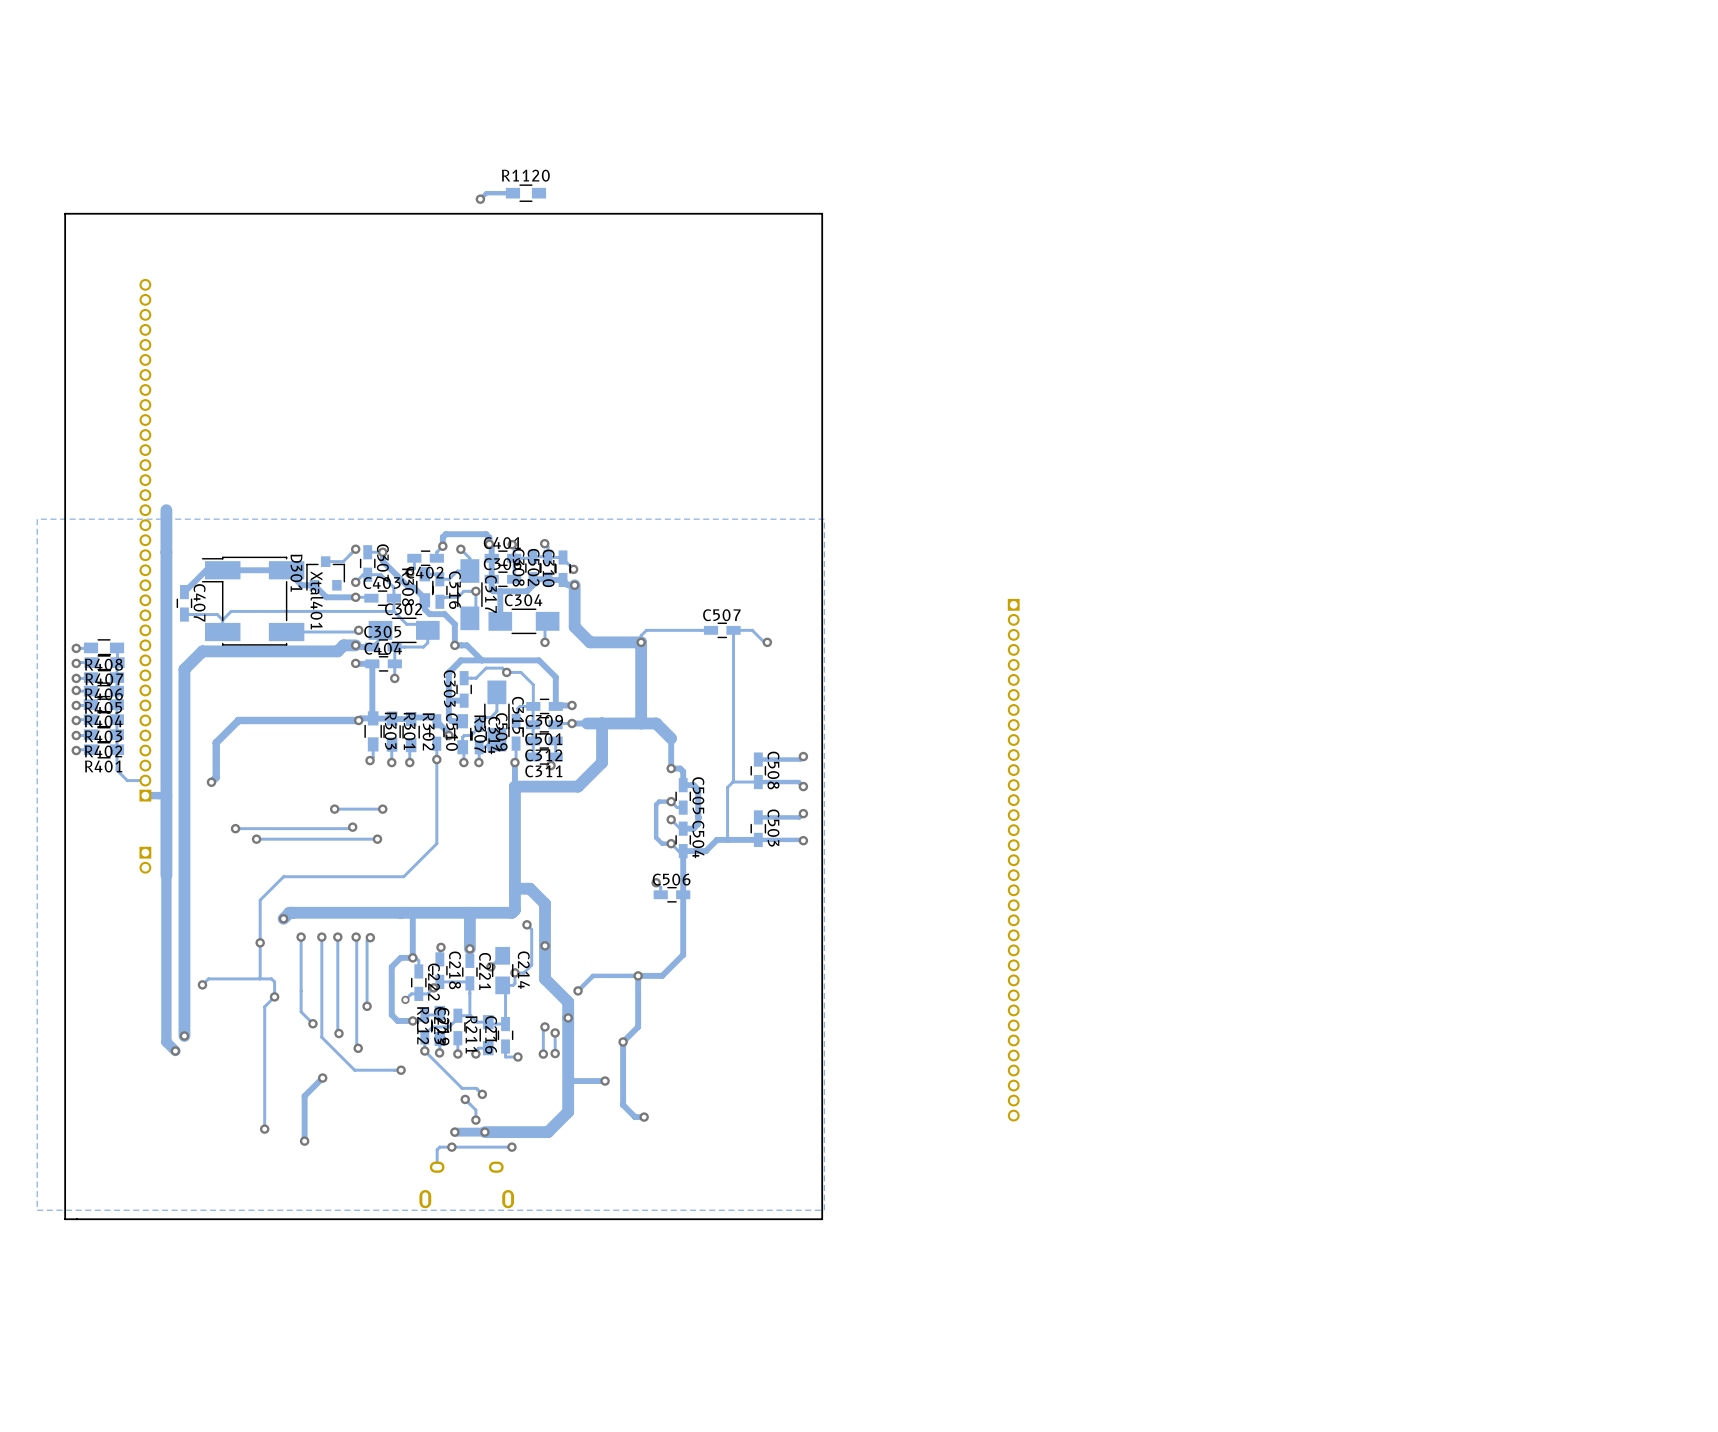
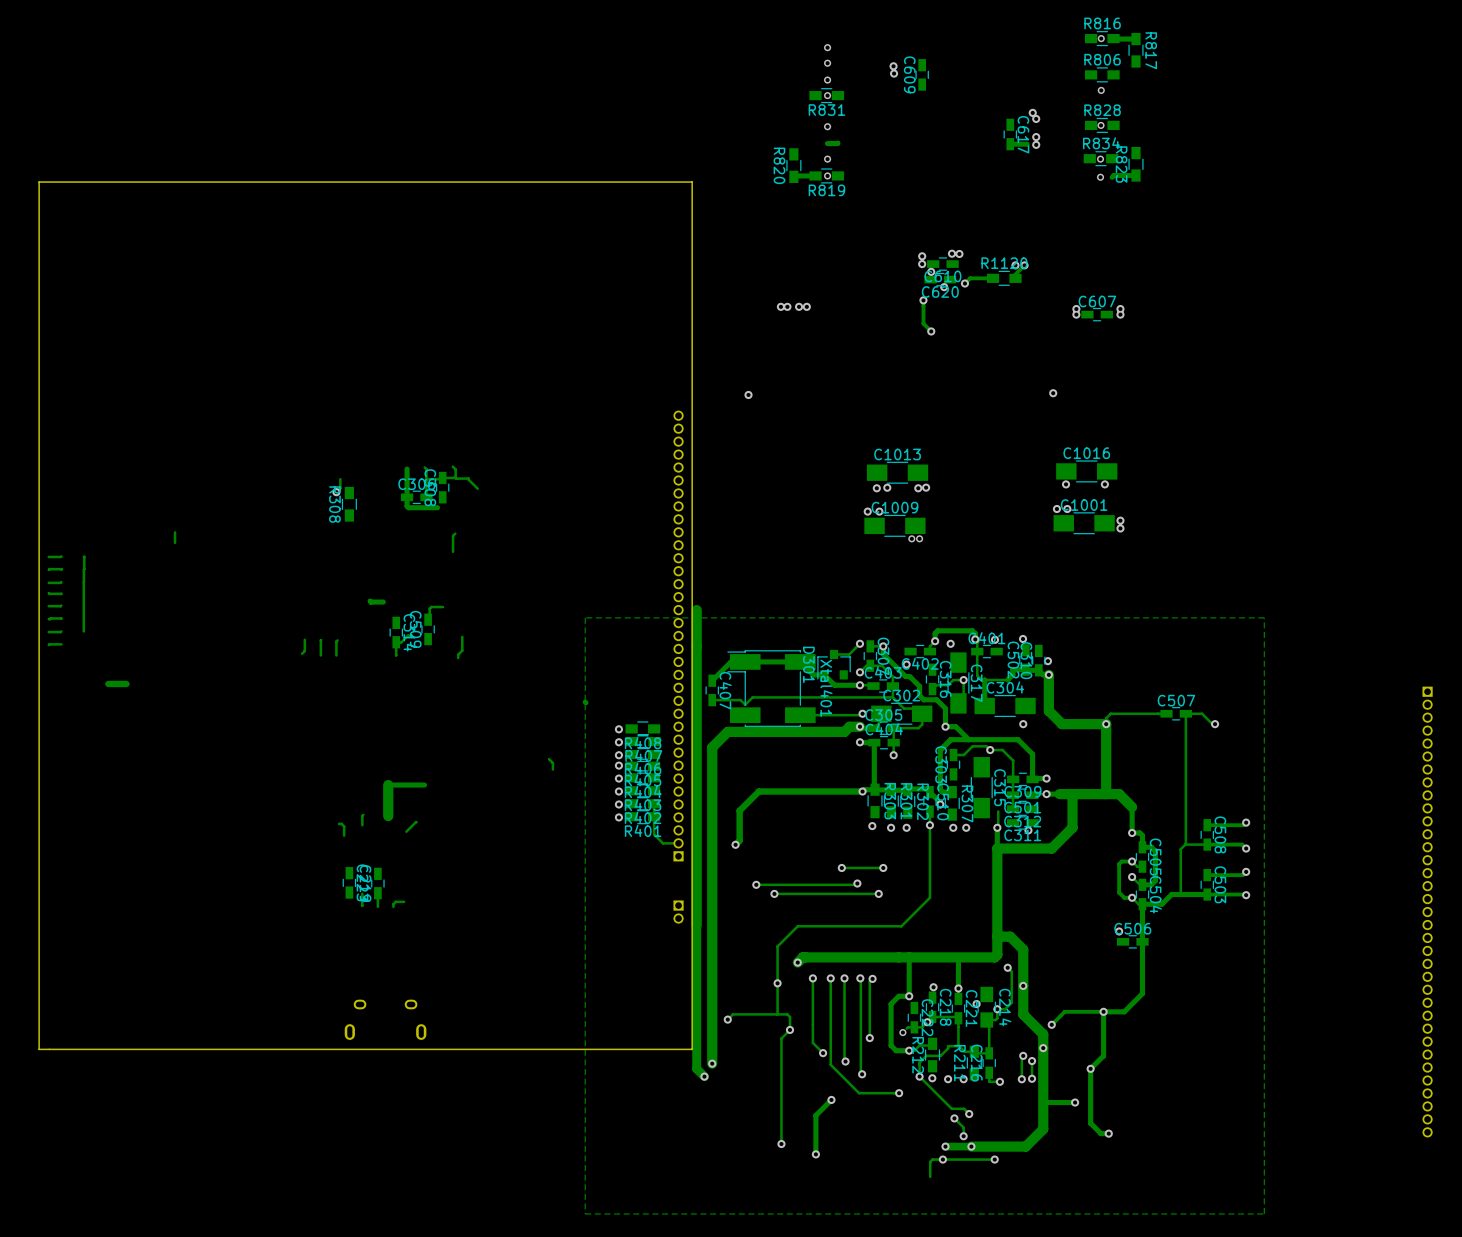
via: none -> (1101, 38)
R816: none -> (1102, 38)
track: none -> (1113, 38) (1136, 39)
via: none -> (827, 47)
R817: none -> (1136, 50)
via: none -> (827, 63)
via: none -> (893, 66)
via: none -> (894, 73)
C609: none -> (922, 74)
R806: none -> (1102, 74)
via: none -> (827, 80)
via: none -> (1101, 90)
R831: none -> (826, 95)
via: none -> (827, 95)
via: none -> (1032, 112)
via: none -> (1036, 118)
via: none -> (1101, 125)
R828: none -> (1102, 125)
via: none -> (827, 126)
C617: none -> (1010, 134)
via: none -> (1036, 137)
track: none -> (837, 143) (827, 143)
track: none -> (1027, 144) (1010, 144)
via: none -> (1036, 144)
R834: none -> (1101, 158)
via: none -> (827, 159)
via: none -> (1100, 159)
track: (512, 193) (486, 193) (480, 199) -> none
R1120 position: (525, 193) -> (1004, 278)
R823: none -> (1136, 164)
R820: none -> (793, 165)
via: (480, 199) -> none
track: none -> (815, 175) (793, 176)
R819: none -> (826, 175)
via: none -> (827, 175)
track: none -> (1136, 175) (1113, 175) (1112, 177)
via: none -> (1100, 177)
via: none -> (951, 253)
via: none -> (959, 253)
via: none -> (922, 256)
via: none -> (922, 264)
C610: none -> (942, 264)
via: none -> (1015, 265)
track: none -> (1024, 265) (1015, 274)
via: none -> (1024, 265)
via: none -> (931, 271)
track: none -> (993, 278) (970, 278) (964, 283)
C620: none -> (940, 279)
via: none -> (964, 283)
via: none -> (944, 287)
track: none -> (923, 300) (923, 323) (931, 331)
via: none -> (923, 300)
via: none -> (780, 306)
via: none -> (787, 306)
via: none -> (799, 306)
via: none -> (806, 306)
via: none -> (1076, 309)
via: none -> (1120, 309)
via: none -> (1076, 314)
C607: none -> (1097, 314)
via: none -> (1120, 314)
via: none -> (931, 331)
via: none -> (1053, 393)
via: none -> (748, 394)
track: (166, 510) (166, 1041) (175, 1050) -> none
zone outline: (824, 519) (824, 1210) (37, 1210) (37, 519) (824, 519) -> none
part: (145, 540) -> none
via: (544, 543) -> none
via: (489, 544) -> none
via: (512, 544) -> none
via: (442, 546) -> none
track: (355, 549) (343, 561) (325, 561) -> none
via: (355, 549) -> none
track: (460, 549) (469, 558) (469, 571) (457, 571) (449, 579) (439, 579) (434, 574) (424, 574) -> none
via: (460, 549) -> none
C1016: none -> (1086, 471)
C1013: none -> (897, 472)
track: (379, 552) (367, 552) -> none
track: (382, 552) (382, 561) (408, 587) (413, 587) (424, 598) (424, 609) (429, 614) (444, 614) (454, 624) (454, 645) (466, 645) (481, 660) (463, 660) (448, 674) (448, 717) -> none
via: (382, 552) -> none
C402 position: (425, 558) -> (920, 651)
track: (436, 558) (436, 552) (442, 546) (442, 537) (445, 534) (486, 534) (489, 537) (489, 544) (491, 546) (491, 586) (496, 591) (526, 591) (532, 585) (532, 579) (563, 579) (568, 585) (574, 585) (574, 626) (590, 642) (641, 642) -> none
C401 position: (502, 558) -> (986, 651)
C307 position: (367, 563) -> (870, 656)
via: none -> (1066, 484)
via: none -> (1104, 484)
C502 position: (548, 568) -> (1025, 660)
C310 position: (563, 568) -> (1038, 660)
via: none -> (876, 488)
via: none -> (887, 487)
via: none -> (918, 488)
via: none -> (926, 487)
via: (573, 569) -> none
D301 position: (325, 573) -> (834, 664)
track: (355, 582) (363, 574) (381, 574) (393, 587) (393, 611) -> none
via: (355, 582) -> none
via: (574, 585) -> none
C316 position: (439, 590) -> (932, 679)
via: (475, 591) -> none
track: (500, 591) (500, 621) -> none
track: (184, 592) (206, 570) (286, 570) (301, 585) (314, 585) (326, 597) (371, 598) -> none
via: none -> (1056, 509)
via: none -> (1067, 509)
C317 position: (469, 594) -> (958, 682)
via: none -> (867, 511)
via: none -> (879, 511)
via: (355, 597) -> none
C403 position: (382, 598) -> (883, 686)
Xtal401 position: (253, 601) -> (771, 688)
track: (439, 601) (444, 597) (457, 597) (463, 591) (475, 591) (475, 612) (469, 618) -> none
C407 position: (184, 603) -> (712, 690)
via: none -> (1120, 520)
C1001: none -> (1084, 523)
track: (393, 611) (231, 611) (222, 619) (217, 614) (184, 614) -> none
track: (393, 611) (406, 624) (419, 624) (427, 630) (427, 642) (423, 647) (394, 647) (394, 678) -> none
C1009: none -> (894, 525)
via: none -> (1120, 528)
C304 position: (523, 621) -> (1005, 705)
via: none -> (911, 538)
via: none -> (919, 538)
track: (358, 630) (357, 632) (286, 632) -> none
via: (358, 630) -> none
track: (380, 630) (380, 638) (372, 647) (343, 645) (337, 651) (202, 651) (184, 669) (184, 1035) -> none
C302 position: (404, 630) -> (901, 713)
track: (711, 630) (646, 630) (641, 635) (641, 642) -> none
C507 position: (722, 630) -> (1176, 713)
via: (544, 642) -> none
track: (641, 642) (641, 723) -> none
via: (641, 642) -> none
track: (767, 642) (764, 642) (752, 630) (733, 630) (733, 781) (727, 787) (727, 839) -> none
via: (767, 642) -> none
via: (355, 645) -> none
via: (454, 645) -> none
R408 position: (104, 647) -> (642, 728)
C305 position: (383, 647) -> (883, 728)
via: (76, 648) -> none
R407 position: (104, 662) -> (643, 741)
via: (76, 663) -> none
track: (355, 663) (372, 663) (373, 718) (433, 717) (448, 735) -> none
via: (355, 663) -> none
C404 position: (383, 663) -> (884, 742)
via: (506, 672) -> none
R406 position: (104, 677) -> (642, 754)
via: (76, 678) -> none
via: (394, 678) -> none
track: (464, 678) (476, 678) (486, 668) (502, 668) (506, 672) (520, 672) (533, 684) (533, 740) -> none
C303 position: (464, 689) -> (953, 764)
via: (76, 690) -> none
R405 position: (103, 691) -> (642, 766)
track: (496, 692) (496, 711) (490, 717) (483, 717) (479, 722) (479, 727) (471, 735) (462, 737) (463, 762) -> none
R404 position: (103, 704) -> (642, 777)
via: (76, 705) -> none
track: (572, 705) (555, 706) (555, 677) (538, 660) (460, 660) (448, 672) (448, 718) (451, 721) (462, 721) -> none
via: (572, 705) -> none
C309 position: (544, 706) -> (1022, 779)
track: none -> (696, 610) (696, 1068) (704, 1076)
C315 position: (496, 716) -> (981, 787)
track: (373, 718) (360, 718) (358, 720) (238, 720) (216, 742) (216, 777) (211, 782) -> none
zone outline: none -> (1264, 617) (1264, 1213) (585, 1213) (585, 617) (1264, 617)
R403 position: (103, 719) -> (642, 790)
via: (76, 720) -> none
via: (358, 720) -> none
via: (572, 723) -> none
track: (656, 723) (602, 723) (602, 762) (578, 786) (514, 786) -> none
track: (656, 723) (555, 724) -> none
track: (656, 723) (671, 738) (671, 768) (680, 768) (683, 771) (683, 785) (693, 785) (698, 789) (698, 823) (693, 828) (680, 828) (671, 819) -> none
C501 position: (544, 724) -> (1022, 795)
R303 position: (373, 731) -> (875, 800)
R301 position: (392, 731) -> (891, 801)
R302 position: (411, 732) -> (907, 801)
C510 position: (436, 732) -> (929, 801)
R402 position: (103, 734) -> (642, 803)
track: (117, 734) (117, 770) (127, 780) (145, 780) -> none
R307 position: (462, 734) -> (952, 803)
via: (76, 735) -> none
via: (448, 735) -> none
C312 position: (544, 740) -> (1022, 809)
track: (533, 741) (533, 756) -> none
track: (436, 743) (436, 843) (403, 876) (283, 876) (260, 900) (259, 978) -> none
track: (516, 743) (514, 786) -> none
via: none -> (1023, 638)
via: none -> (975, 639)
via: none -> (995, 639)
via: none -> (935, 641)
R401 position: (104, 749) -> (642, 816)
track: none -> (859, 643) (849, 654) (834, 654)
via: none -> (859, 643)
via: none -> (950, 643)
via: (76, 750) -> none
track: none -> (880, 646) (870, 646)
track: none -> (883, 646) (883, 654) (905, 676) (909, 676) (919, 686) (919, 695) (923, 699) (936, 699) (945, 708) (945, 726) (955, 726) (968, 739) (952, 739) (940, 752) (940, 788)
via: none -> (883, 646)
C311 position: (544, 756) -> (1022, 822)
track: (803, 756) (800, 759) (758, 759) -> none
via: (803, 756) -> none
track: none -> (929, 651) (929, 646) (935, 641) (935, 633) (937, 630) (972, 630) (977, 641) (977, 675) (981, 680) (1007, 680) (1012, 674) (1012, 669) (1038, 670) (1043, 674) (1048, 674) (1048, 710) (1062, 724) (1106, 724)
via: (436, 759) -> none
via: (370, 760) -> none
via: (391, 762) -> none
via: (409, 762) -> none
via: (463, 762) -> none
via: (478, 762) -> none
via: (514, 762) -> none
via: (551, 765) -> none
via: (671, 768) -> none
via: none -> (1047, 661)
C508 position: (758, 770) -> (1207, 834)
via: none -> (906, 664)
via: (211, 782) -> none
track: (733, 782) (798, 782) (803, 786) -> none
track: none -> (859, 672) (866, 665) (881, 665) (892, 676) (892, 697)
via: none -> (859, 672)
via: none -> (1048, 674)
track: (514, 786) (514, 909) (511, 912) (289, 912) (283, 918) -> none
via: (803, 786) -> none
track: none -> (712, 680) (731, 661) (800, 661) (813, 674) (824, 674) (834, 685) (873, 686)
via: none -> (963, 680)
track: none -> (984, 680) (984, 705)
C505 position: (683, 796) -> (1142, 856)
via: none -> (859, 685)
via: (671, 801) -> none
track: none -> (932, 689) (936, 685) (948, 685) (953, 680) (963, 680) (963, 698) (958, 703)
track: (683, 807) (677, 807) (671, 801) (659, 801) (656, 804) (656, 837) (662, 843) (671, 843) (678, 851) (683, 851) -> none
via: (334, 809) -> none
track: (382, 809) (334, 809) -> none
via: (382, 809) -> none
track: none -> (892, 697) (752, 697) (745, 704) (740, 700) (712, 700)
track: none -> (892, 697) (904, 708) (914, 708) (922, 713) (922, 724) (918, 728) (893, 728) (893, 755)
track: (803, 813) (799, 817) (758, 817) -> none
via: (803, 813) -> none
via: (671, 819) -> none
track: (352, 827) (235, 828) -> none
via: (352, 827) -> none
via: (235, 828) -> none
C503 position: (758, 828) -> (1207, 884)
track: none -> (862, 713) (800, 715)
via: none -> (862, 713)
track: none -> (881, 713) (881, 720) (874, 728) (849, 726) (844, 731) (727, 731) (712, 747) (712, 1063)
track: none -> (1166, 713) (1110, 713) (1106, 718) (1106, 724)
via: (256, 839) -> none
track: (377, 839) (256, 839) -> none
via: (377, 839) -> none
C504 position: (683, 839) -> (1142, 894)
track: (803, 840) (717, 839) (705, 851) (683, 851) -> none
via: (803, 840) -> none
via: none -> (1023, 724)
track: none -> (1106, 724) (1106, 794)
via: none -> (1106, 724)
track: none -> (1215, 724) (1212, 724) (1202, 713) (1185, 713) (1185, 844) (1180, 849) (1180, 894)
via: none -> (1215, 724)
via: (671, 843) -> none
via: none -> (859, 726)
via: none -> (945, 726)
via: none -> (618, 729)
track: (683, 851) (683, 954) (662, 975) (638, 975) -> none
part: (145, 860) -> none
part rotation: 0° (1013, 860) -> 180° (678, 636)
via: none -> (618, 742)
track: none -> (859, 742) (874, 742) (875, 789) (926, 788) (940, 804)
via: none -> (859, 742)
via: none -> (990, 750)
track: none -> (953, 755) (963, 755) (972, 746) (986, 746) (990, 750) (1002, 750) (1013, 760) (1012, 809)
via: none -> (618, 755)
via: none -> (893, 755)
via: (656, 882) -> none
track: (514, 888) (529, 888) (544, 903) (544, 978) (568, 1002) (568, 1111) -> none
via: none -> (618, 765)
C506 position: (671, 894) -> (1132, 941)
via: none -> (618, 778)
track: none -> (1046, 778) (1032, 779) (1032, 754) (1018, 739) (950, 739) (940, 749) (940, 789) (942, 792) (952, 792)
via: none -> (1046, 778)
track: (412, 912) (412, 957) (400, 957) (391, 966) (391, 1014) (397, 1020) (418, 1020) (424, 1014) (437, 1014) (439, 1012) -> none
via: (283, 918) -> none
track: none -> (875, 789) (864, 789) (862, 791) (758, 791) (739, 810) (739, 840) (735, 844)
via: none -> (618, 791)
via: none -> (862, 791)
via: none -> (1046, 794)
track: none -> (1119, 794) (1072, 794) (1072, 827) (1051, 848) (997, 848)
track: none -> (1119, 794) (1032, 795)
track: none -> (1119, 794) (1132, 807) (1132, 832) (1139, 832) (1142, 835) (1142, 847) (1151, 847) (1155, 851) (1155, 880) (1151, 884) (1139, 884) (1132, 877)
track: (526, 924) (531, 929) (531, 965) (523, 972) (514, 972) (514, 983) (513, 985) (502, 985) (505, 988) (505, 1024) (477, 1022) (470, 1015) (457, 1015) (457, 1018) (449, 1026) (432, 1026) (424, 1034) (424, 1050) (462, 1088) (476, 1088) (482, 1094) -> none
via: (526, 924) -> none
track: none -> (654, 803) (654, 834) (662, 843) (678, 843)
via: none -> (618, 804)
via: none -> (940, 804)
track: (301, 937) (301, 1011) (312, 1023) -> none
via: (301, 937) -> none
track: (321, 937) (321, 1037) (354, 1070) (401, 1070) -> none
via: (321, 937) -> none
track: (337, 937) (338, 1033) -> none
via: (337, 937) -> none
track: (356, 937) (358, 1048) -> none
via: (356, 937) -> none
track: (370, 937) (367, 940) (367, 1006) -> none
via: (370, 937) -> none
via: (260, 942) -> none
track: none -> (929, 811) (929, 897) (901, 926) (797, 926) (777, 946) (777, 1014)
track: none -> (998, 811) (997, 848)
via: (544, 945) -> none
via: (441, 947) -> none
via: (469, 948) -> none
via: none -> (618, 817)
track: none -> (1246, 822) (1243, 825) (1207, 825)
via: none -> (1246, 822)
via: (412, 957) -> none
via: none -> (929, 825)
via: none -> (872, 826)
via: none -> (891, 827)
via: none -> (906, 827)
via: none -> (953, 827)
via: none -> (966, 827)
via: none -> (997, 827)
via: none -> (1028, 830)
via: (490, 966) -> none
via: none -> (1132, 832)
C218 position: (439, 970) -> (932, 1007)
C214 position: (502, 970) -> (986, 1007)
C221 position: (469, 972) -> (958, 1008)
via: (514, 972) -> none
track: (638, 975) (638, 1026) (623, 1041) (623, 1105) (635, 1117) (644, 1117) -> none
track: (638, 975) (593, 975) (578, 990) -> none
via: (638, 975) -> none
track: none -> (1185, 844) (1242, 844) (1246, 848)
C222 position: (418, 982) -> (914, 1017)
via: none -> (735, 844)
track: (202, 984) (208, 978) (271, 978) (274, 981) (274, 996) (264, 1006) (264, 1129) -> none
via: (202, 984) -> none
track: none -> (997, 848) (997, 954) (994, 957) (802, 957) (797, 962)
via: none -> (1246, 848)
via: (433, 987) -> none
via: (578, 990) -> none
via: (274, 996) -> none
track: (405, 999) (411, 993) (427, 993) (439, 981) (468, 981) (469, 1015) -> none
via: (405, 999) -> none
via: none -> (1132, 861)
via: (367, 1006) -> none
track: none -> (1142, 866) (1137, 866) (1132, 861) (1121, 861) (1119, 864) (1119, 892) (1124, 897) (1132, 897) (1138, 904) (1142, 904)
via: none -> (841, 867)
track: none -> (883, 867) (841, 867)
via: none -> (883, 867)
track: none -> (1246, 871) (1242, 875) (1207, 875)
via: none -> (1246, 871)
via: (568, 1017) -> none
via: none -> (1132, 877)
via: (412, 1020) -> none
via: (312, 1023) -> none
R212 position: (439, 1025) -> (932, 1055)
track: (544, 1026) (543, 1028) (543, 1054) -> none
via: (544, 1026) -> none
track: none -> (857, 883) (756, 884)
via: none -> (857, 883)
via: none -> (756, 884)
track: (555, 1032) (555, 1053) -> none
via: (555, 1032) -> none
via: (338, 1033) -> none
via: (184, 1035) -> none
R211 position: (488, 1035) -> (974, 1062)
C216 position: (505, 1035) -> (989, 1063)
via: none -> (774, 893)
track: none -> (878, 893) (774, 893)
via: none -> (878, 893)
track: none -> (1246, 895) (1171, 894) (1161, 904) (1142, 904)
via: none -> (1246, 895)
via: (623, 1041) -> none
via: none -> (1132, 897)
track: (505, 1046) (505, 1057) (517, 1057) -> none
via: (358, 1048) -> none
via: (175, 1050) -> none
via: (424, 1050) -> none
track: none -> (1142, 904) (1142, 993) (1124, 1011) (1103, 1011)
via: (439, 1052) -> none
via: (555, 1053) -> none
via: (457, 1054) -> none
via: (475, 1054) -> none
via: (543, 1054) -> none
via: (517, 1057) -> none
part: none -> (678, 912)
part: none -> (1427, 912)
via: (401, 1070) -> none
track: (322, 1078) (304, 1096) (304, 1141) -> none
via: (322, 1078) -> none
track: (605, 1081) (568, 1081) -> none
via: (605, 1081) -> none
via: none -> (1119, 931)
track: none -> (997, 936) (1010, 936) (1023, 949) (1023, 1014) (1043, 1034) (1043, 1129)
via: (482, 1094) -> none
track: (465, 1099) (475, 1110) (475, 1120) -> none
via: (465, 1099) -> none
track: (568, 1111) (548, 1132) (454, 1132) -> none
track: none -> (909, 957) (909, 996) (898, 996) (891, 1004) (891, 1045) (896, 1050) (914, 1050) (919, 1045) (932, 1043)
track: none -> (961, 957) (958, 959) (958, 998)
via: (644, 1117) -> none
via: none -> (797, 962)
via: (475, 1120) -> none
track: none -> (1007, 967) (1011, 971) (1011, 1002) (1005, 1009) (997, 1009) (995, 1020) (986, 1020) (989, 1022) (989, 1053) (964, 1051) (959, 1046) (948, 1046) (940, 1055) (926, 1055) (919, 1062) (919, 1076) (951, 1108) (964, 1108) (969, 1114)
via: none -> (1007, 967)
via: (264, 1129) -> none
via: (454, 1132) -> none
via: (484, 1132) -> none
track: none -> (812, 978) (812, 1042) (823, 1053)
via: none -> (812, 978)
track: none -> (830, 978) (830, 1064) (859, 1093) (899, 1093)
via: none -> (830, 978)
track: none -> (844, 978) (845, 1061)
via: none -> (844, 978)
track: none -> (860, 978) (862, 1074)
via: none -> (860, 978)
track: none -> (872, 978) (869, 981) (869, 1038)
via: none -> (872, 978)
via: (304, 1141) -> none
via: none -> (777, 983)
via: none -> (1023, 985)
via: (451, 1147) -> none
track: (511, 1147) (439, 1147) (437, 1149) (437, 1167) -> none
via: (511, 1147) -> none
via: none -> (933, 987)
via: none -> (958, 988)
via: none -> (909, 996)
via: none -> (976, 1004)
via: none -> (997, 1009)
track: none -> (1103, 1011) (1103, 1055) (1090, 1068) (1090, 1123) (1101, 1133) (1108, 1133)
track: none -> (1103, 1011) (1064, 1011) (1051, 1024)
via: none -> (1103, 1011)
track: none -> (727, 1019) (732, 1014) (787, 1014) (789, 1017) (789, 1029) (781, 1038) (781, 1144)
via: none -> (727, 1019)
via: none -> (927, 1022)
via: none -> (1051, 1024)
track: none -> (906, 1028) (922, 1027) (932, 1017) (957, 1017) (958, 1046)
via: none -> (789, 1029)
via: none -> (902, 1032)
via: none -> (869, 1038)
via: none -> (1043, 1048)
via: none -> (909, 1050)
via: none -> (823, 1053)
track: none -> (1023, 1055) (1021, 1079)
via: none -> (1023, 1055)
track: none -> (1032, 1061) (1032, 1078)
via: none -> (1032, 1061)
via: none -> (845, 1061)
via: none -> (712, 1063)
via: none -> (1090, 1068)
track: none -> (989, 1072) (989, 1081) (999, 1081)
via: none -> (862, 1074)
via: none -> (704, 1076)
via: none -> (919, 1076)
via: none -> (932, 1078)
via: none -> (948, 1079)
via: none -> (963, 1079)
via: none -> (1021, 1079)
via: none -> (1032, 1078)
via: none -> (999, 1081)
via: none -> (899, 1093)
track: none -> (831, 1099) (815, 1115) (815, 1154)
via: none -> (831, 1099)
track: none -> (1075, 1102) (1043, 1102)
via: none -> (1075, 1102)
via: none -> (969, 1114)
track: none -> (954, 1118) (963, 1127) (963, 1136)
via: none -> (954, 1118)
track: none -> (1043, 1129) (1025, 1146) (945, 1146)
via: none -> (1108, 1133)
via: none -> (963, 1136)
via: none -> (781, 1144)
via: none -> (945, 1146)
via: none -> (971, 1146)
via: none -> (815, 1154)
via: none -> (942, 1159)
track: none -> (994, 1159) (932, 1159) (930, 1161) (930, 1176)
via: none -> (994, 1159)

